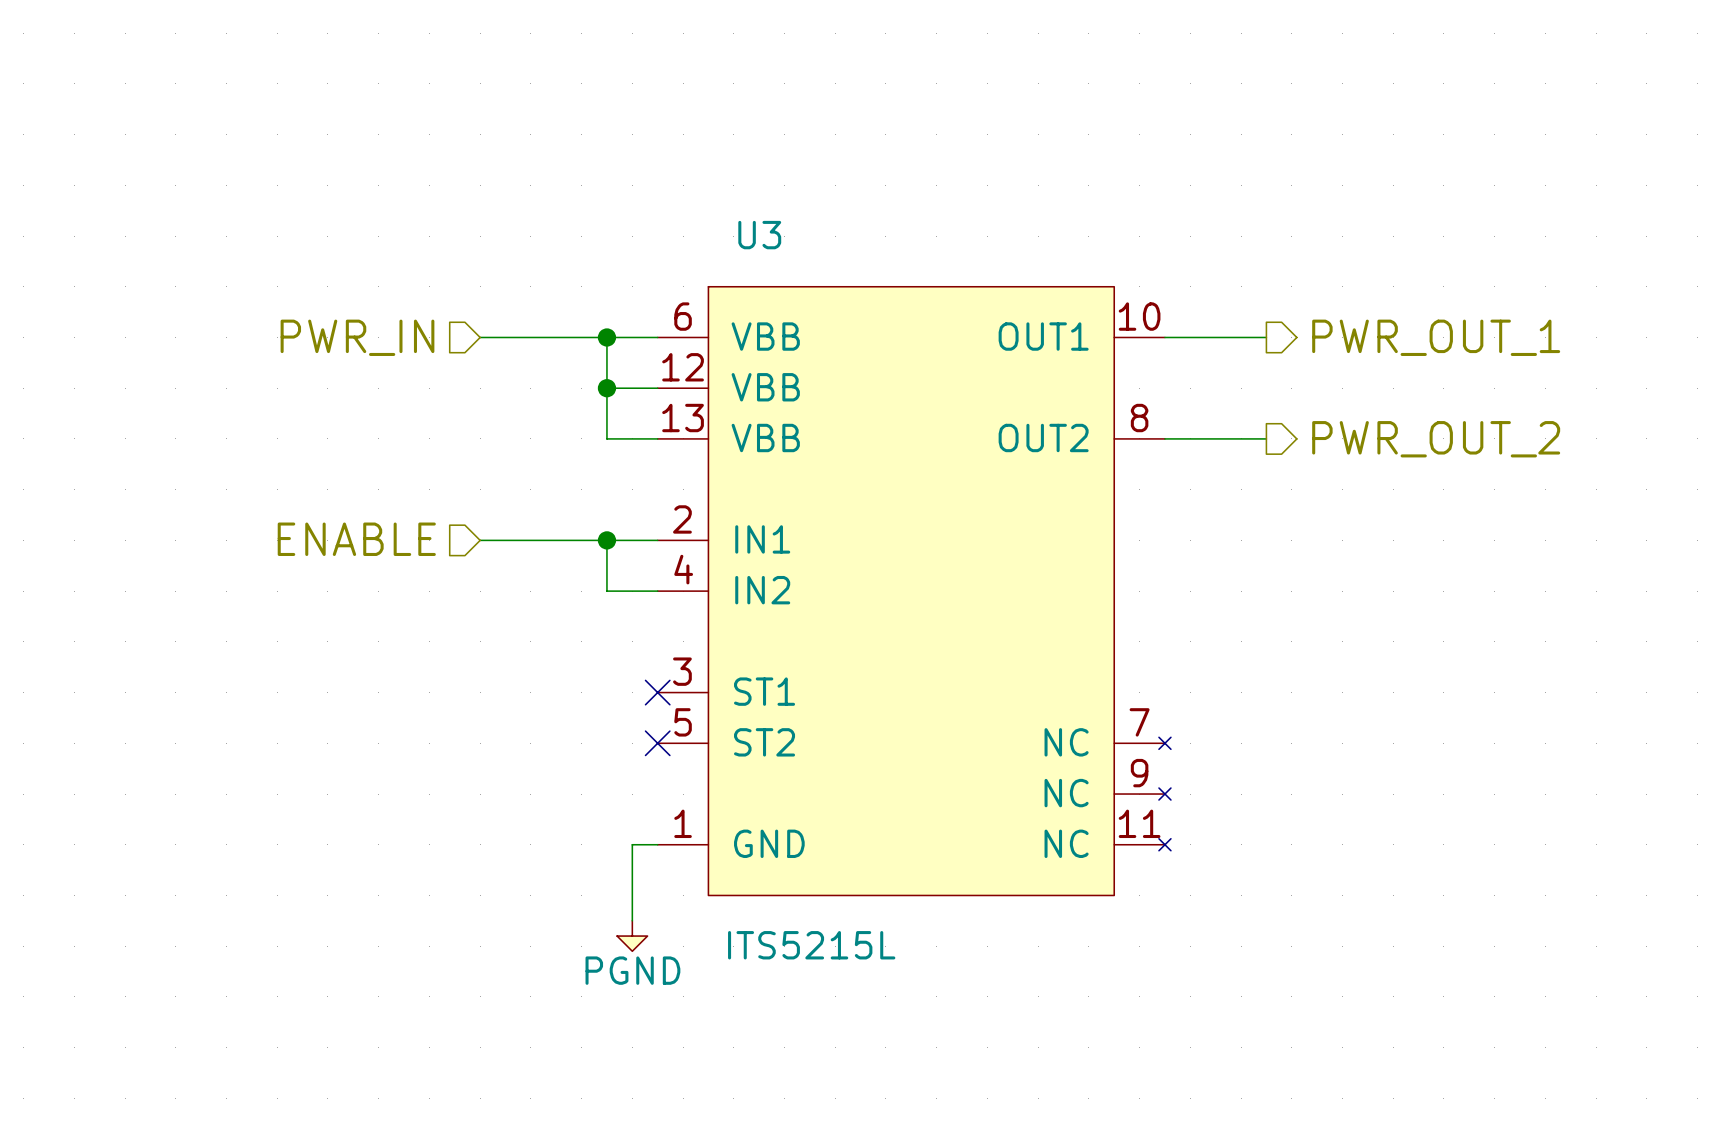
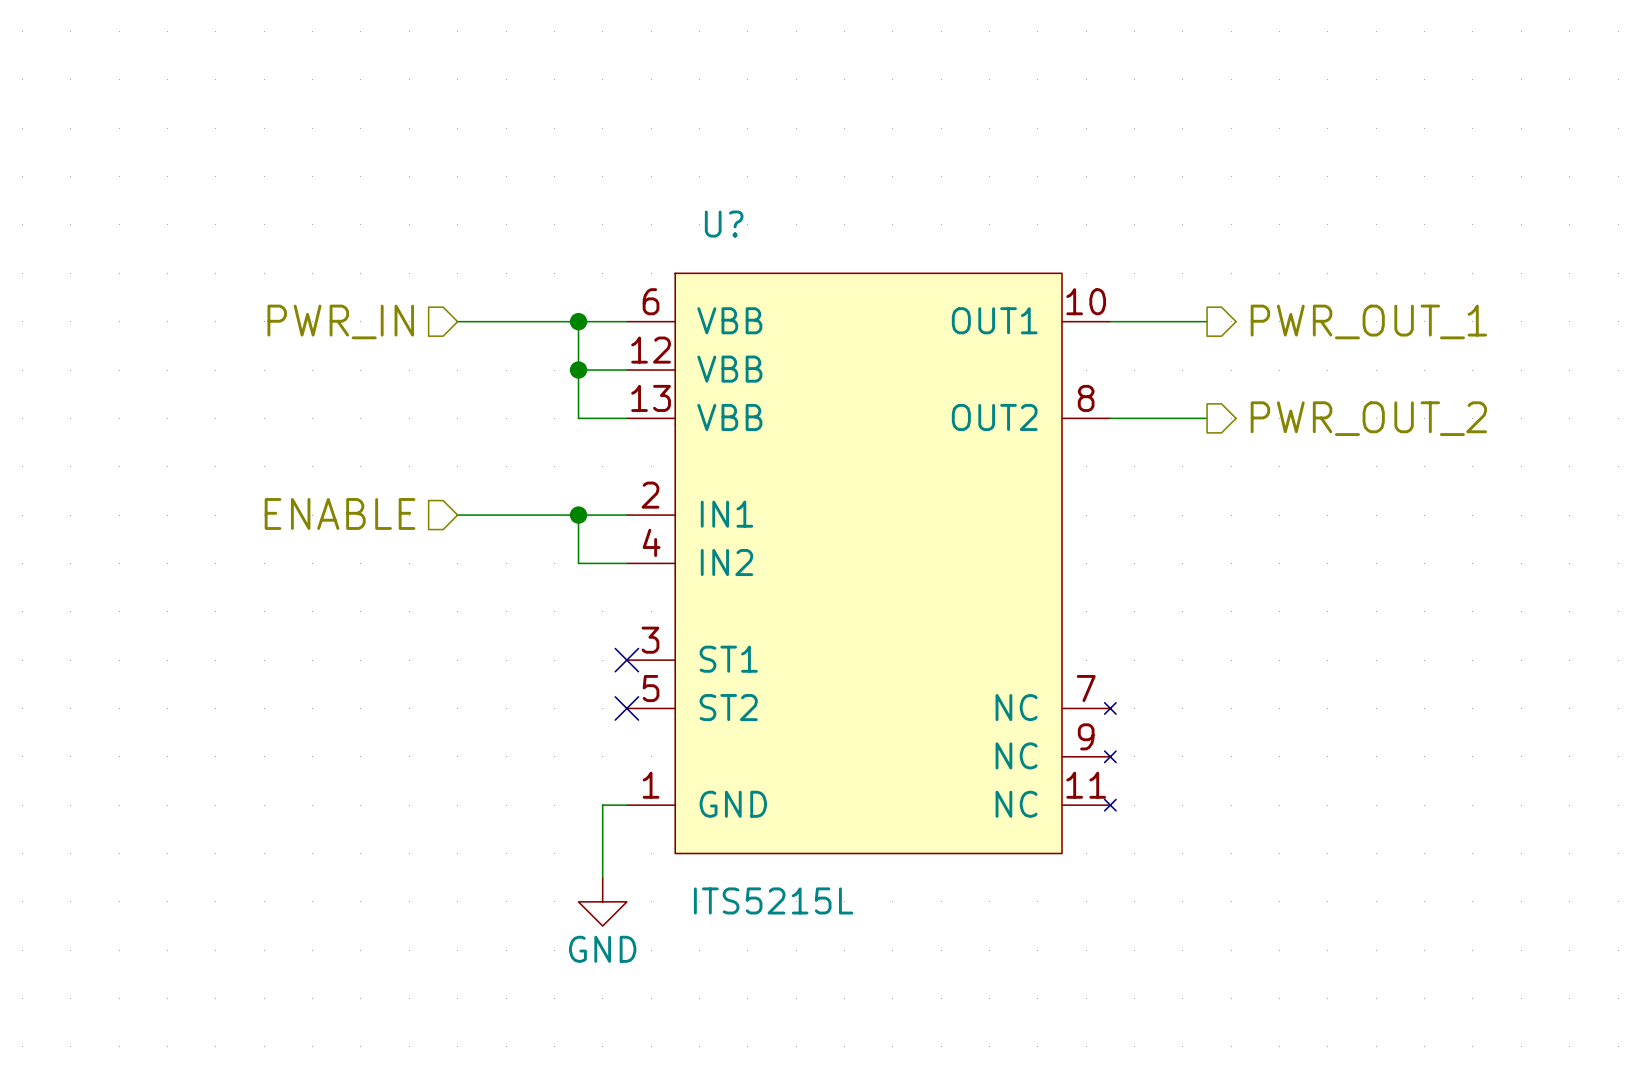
U3 name: U3 (759, 235) -> U? (724, 224)
power symbol: PGND (632, 936) -> GND (602, 901)

